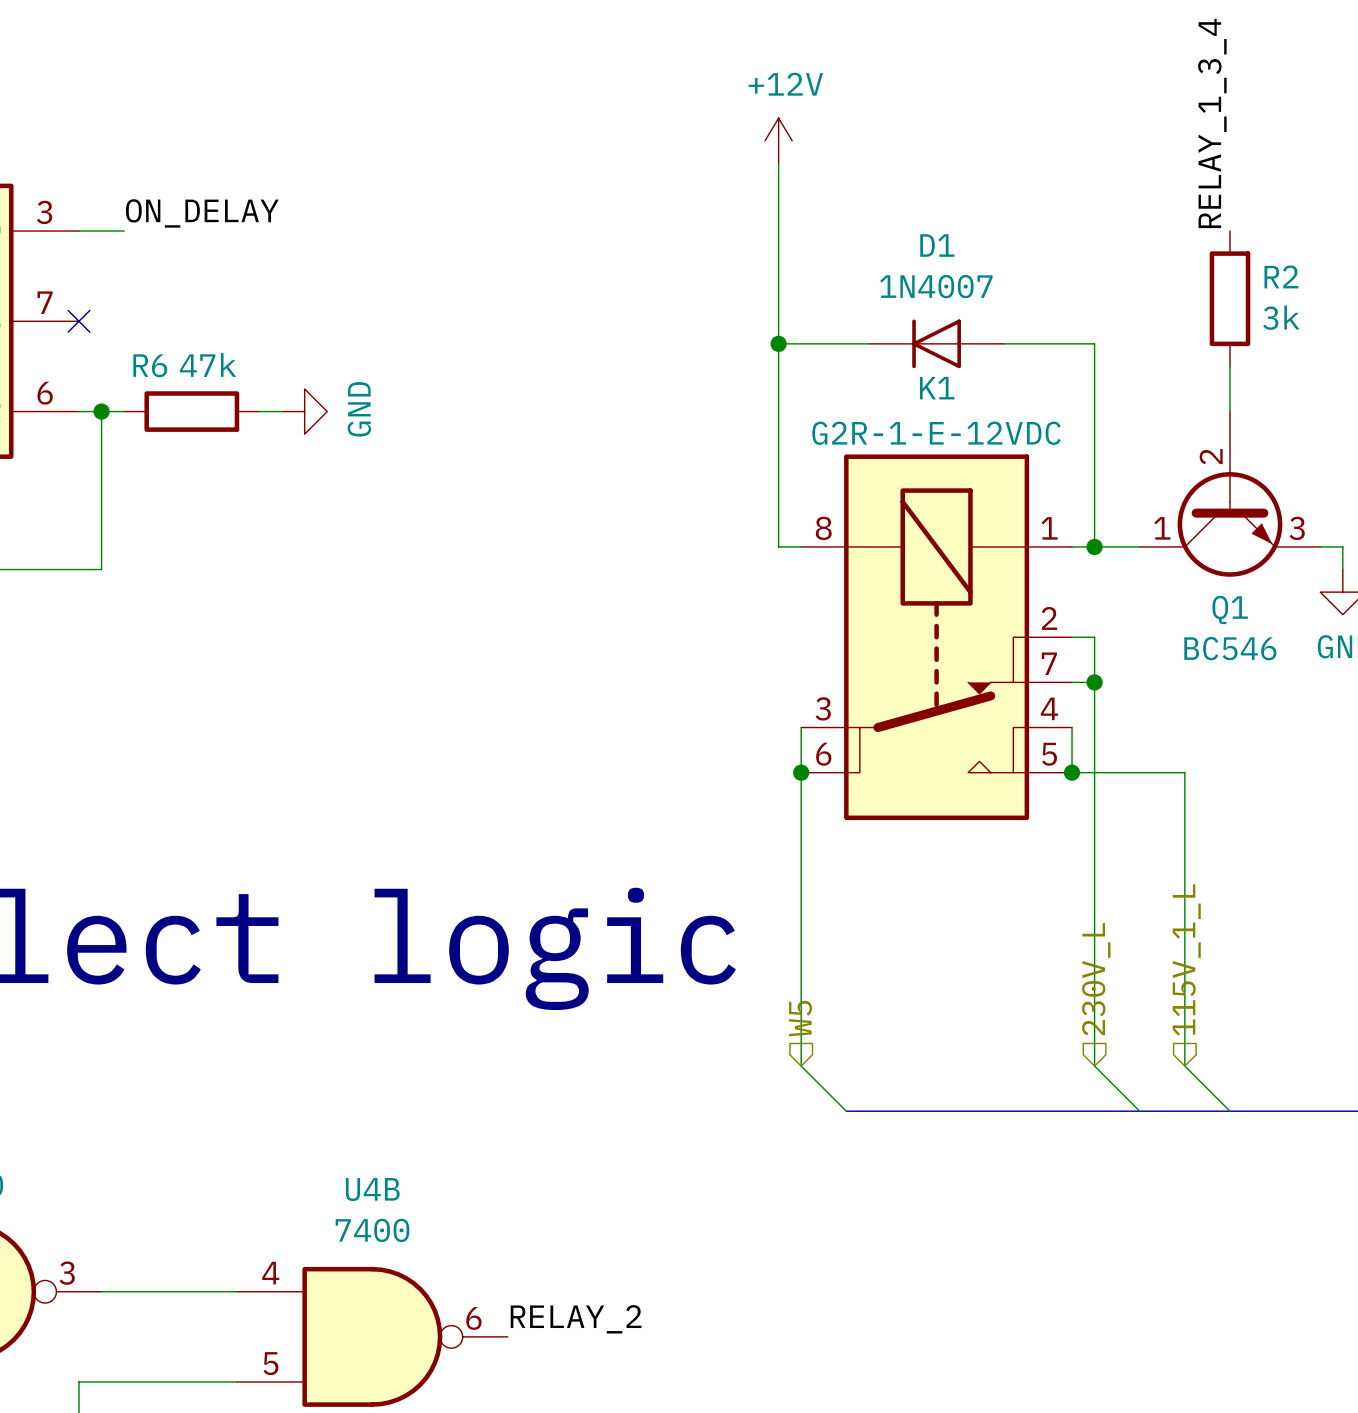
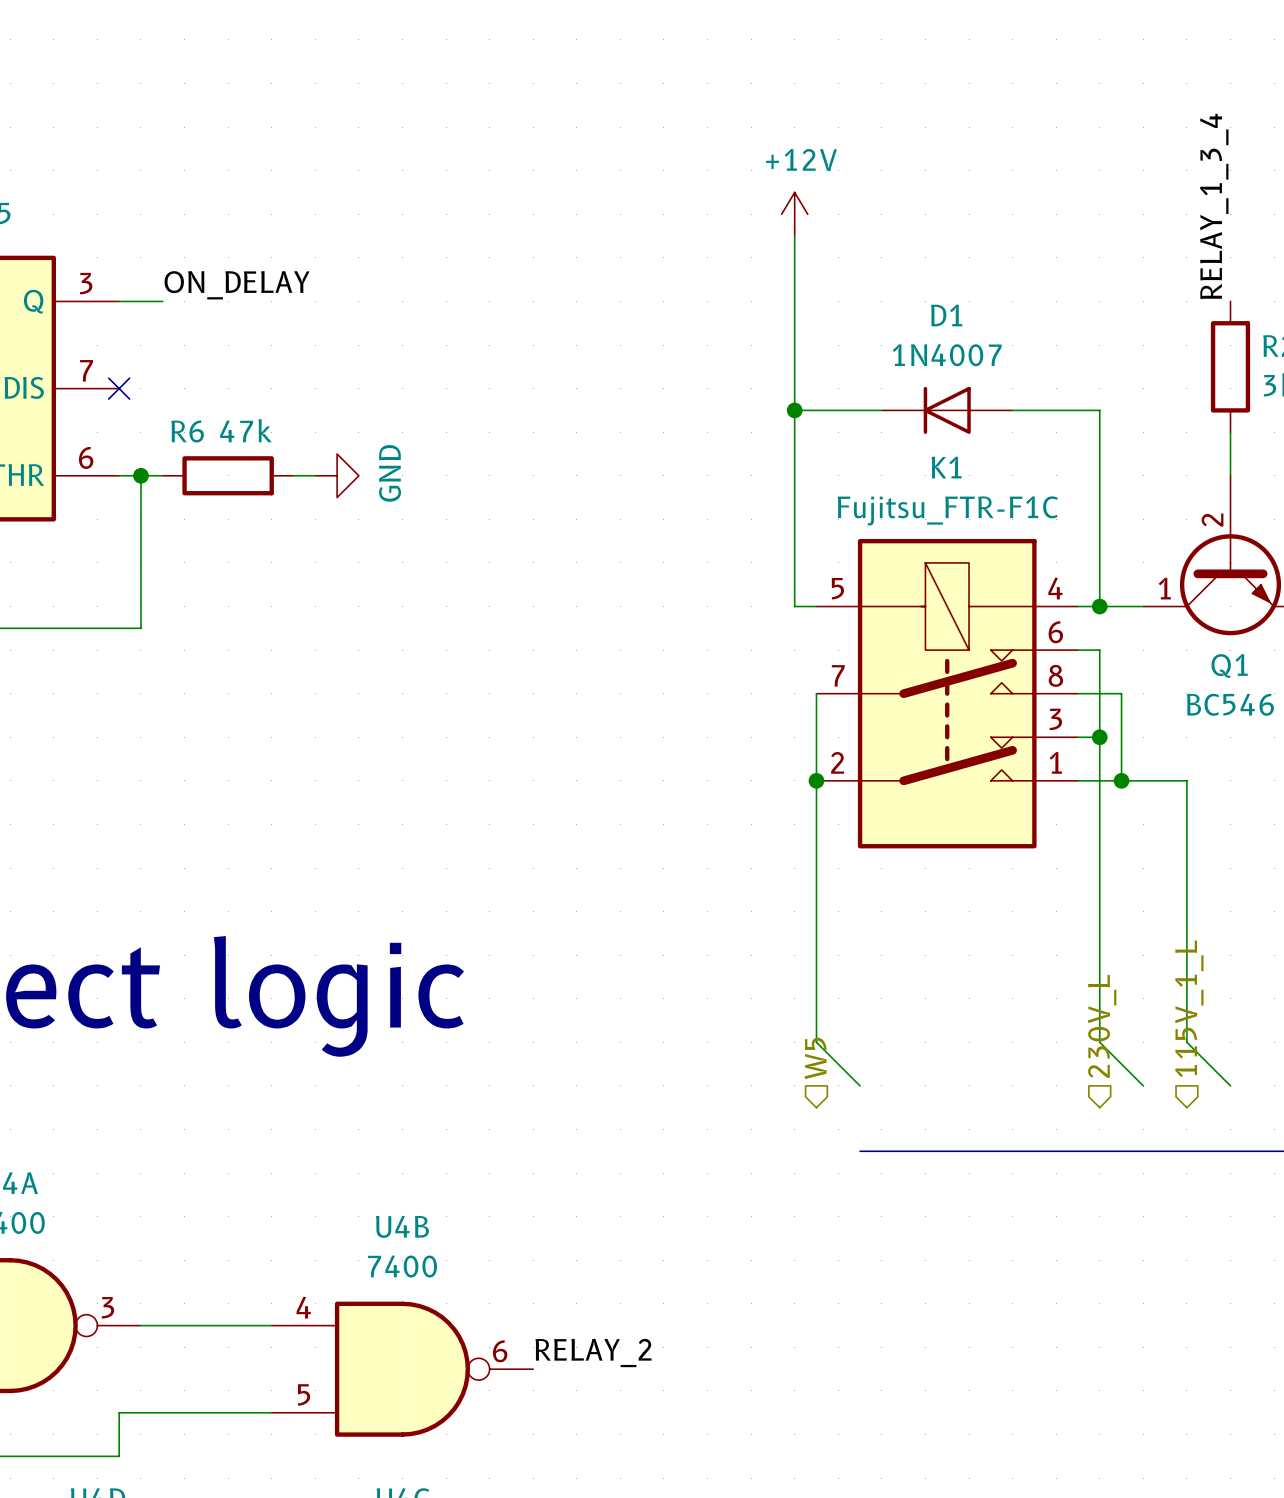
K1 value: G2R-1-E-12VDC (936, 433) -> Fujitsu_FTR-F1C (947, 510)
K1 symbol: [801, 454, 1073, 821] -> [816, 538, 1078, 849]
wire: none -> (1077, 650) (1099, 650) (1099, 693) (1121, 693) (1121, 780)
wire: none -> (816, 693) (816, 780)
wire: (1072, 727) (1072, 772) (1184, 772) -> (1077, 780) (1186, 780) (1186, 824)
junction position: (801, 772) -> (816, 780)
junction position: (1072, 772) -> (1121, 780)
wire: (801, 998) (801, 1066) (846, 1111) -> (816, 1042) (860, 1085)
wire: (1094, 998) (1094, 1066) (1139, 1111) -> (1099, 1042) (1143, 1085)
wire: (1184, 998) (1184, 1066) (1229, 1111) -> (1186, 1042) (1230, 1085)

